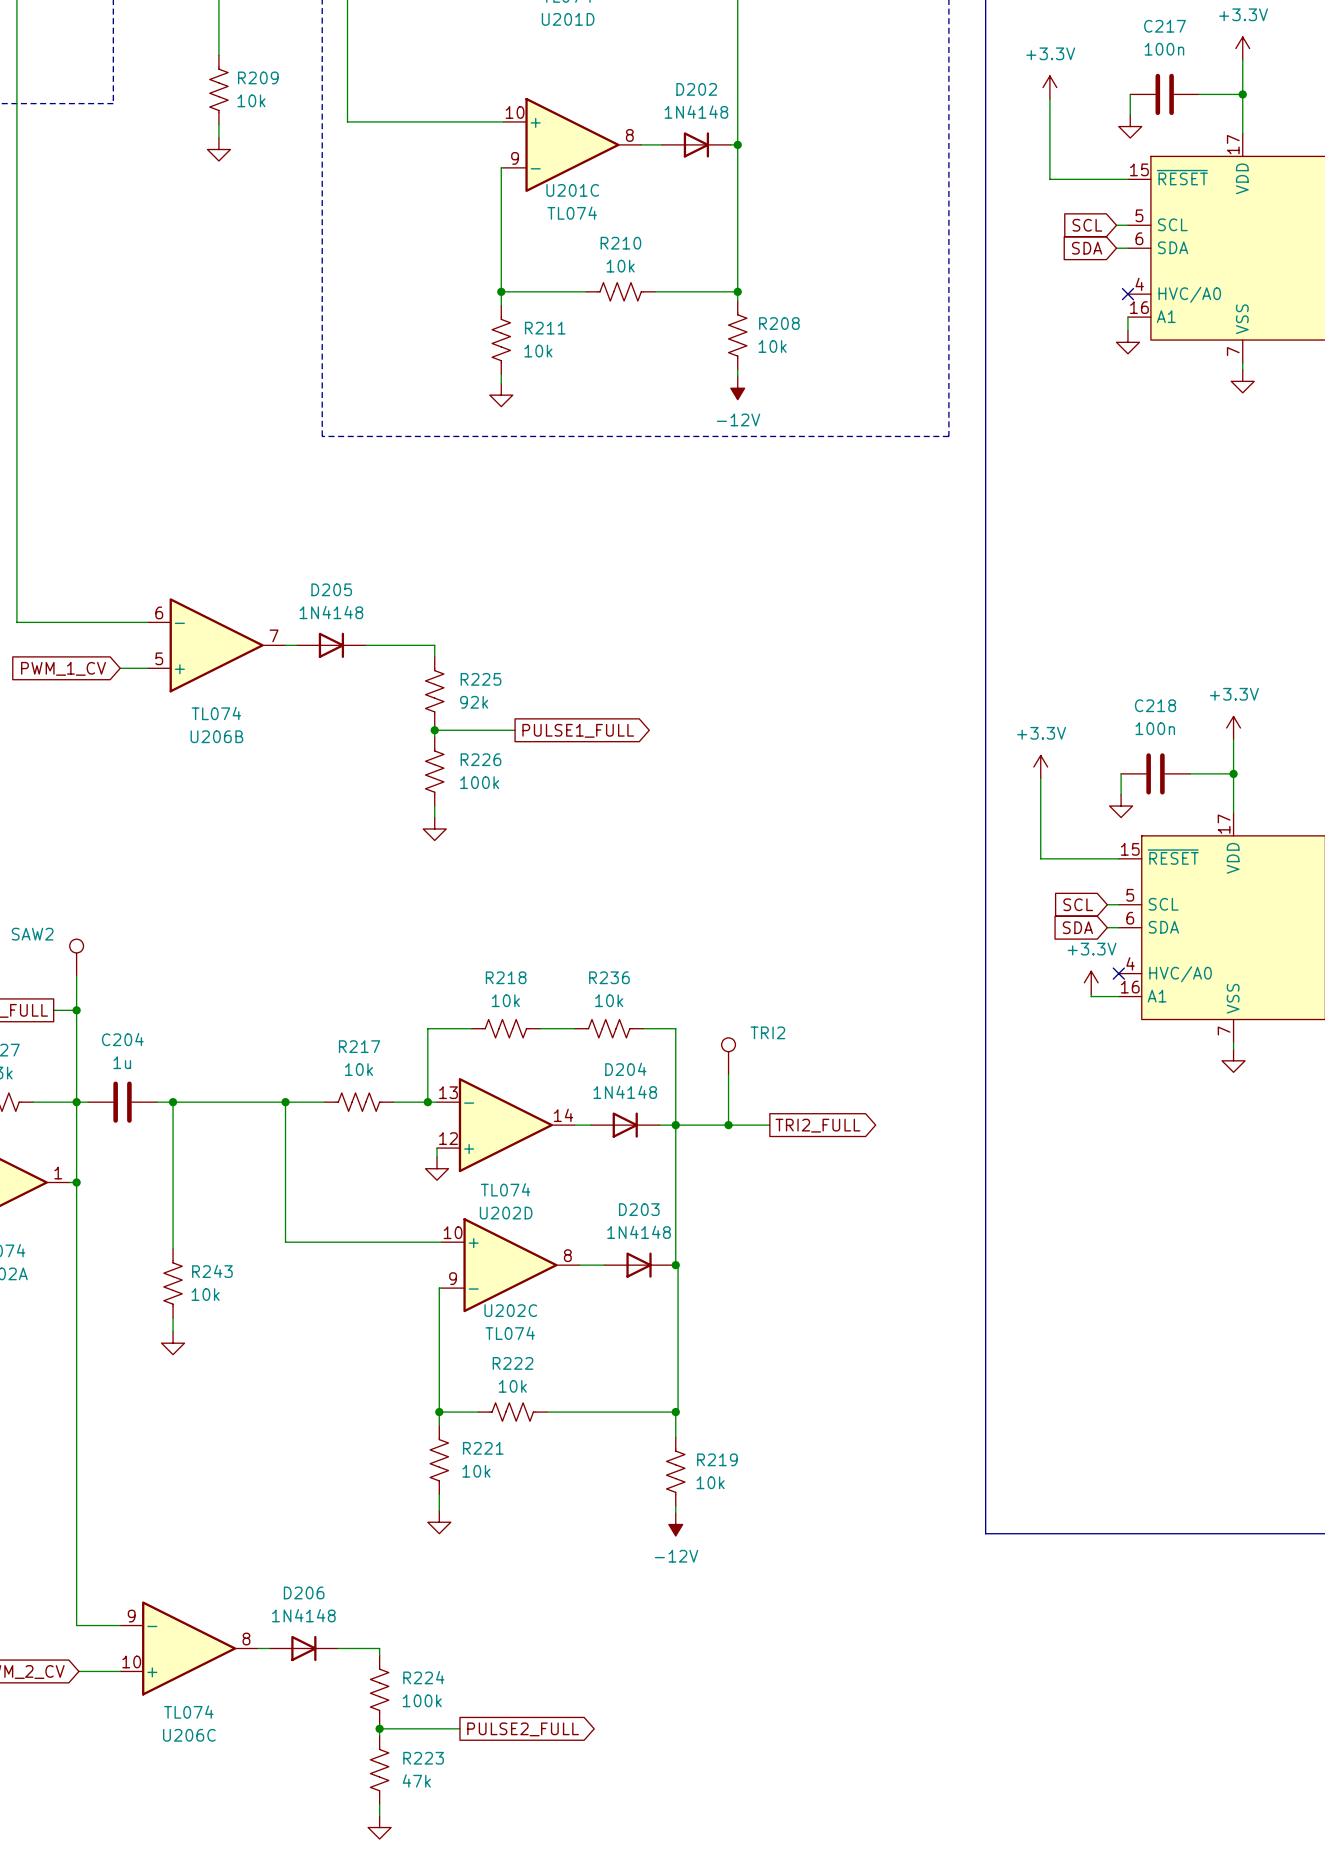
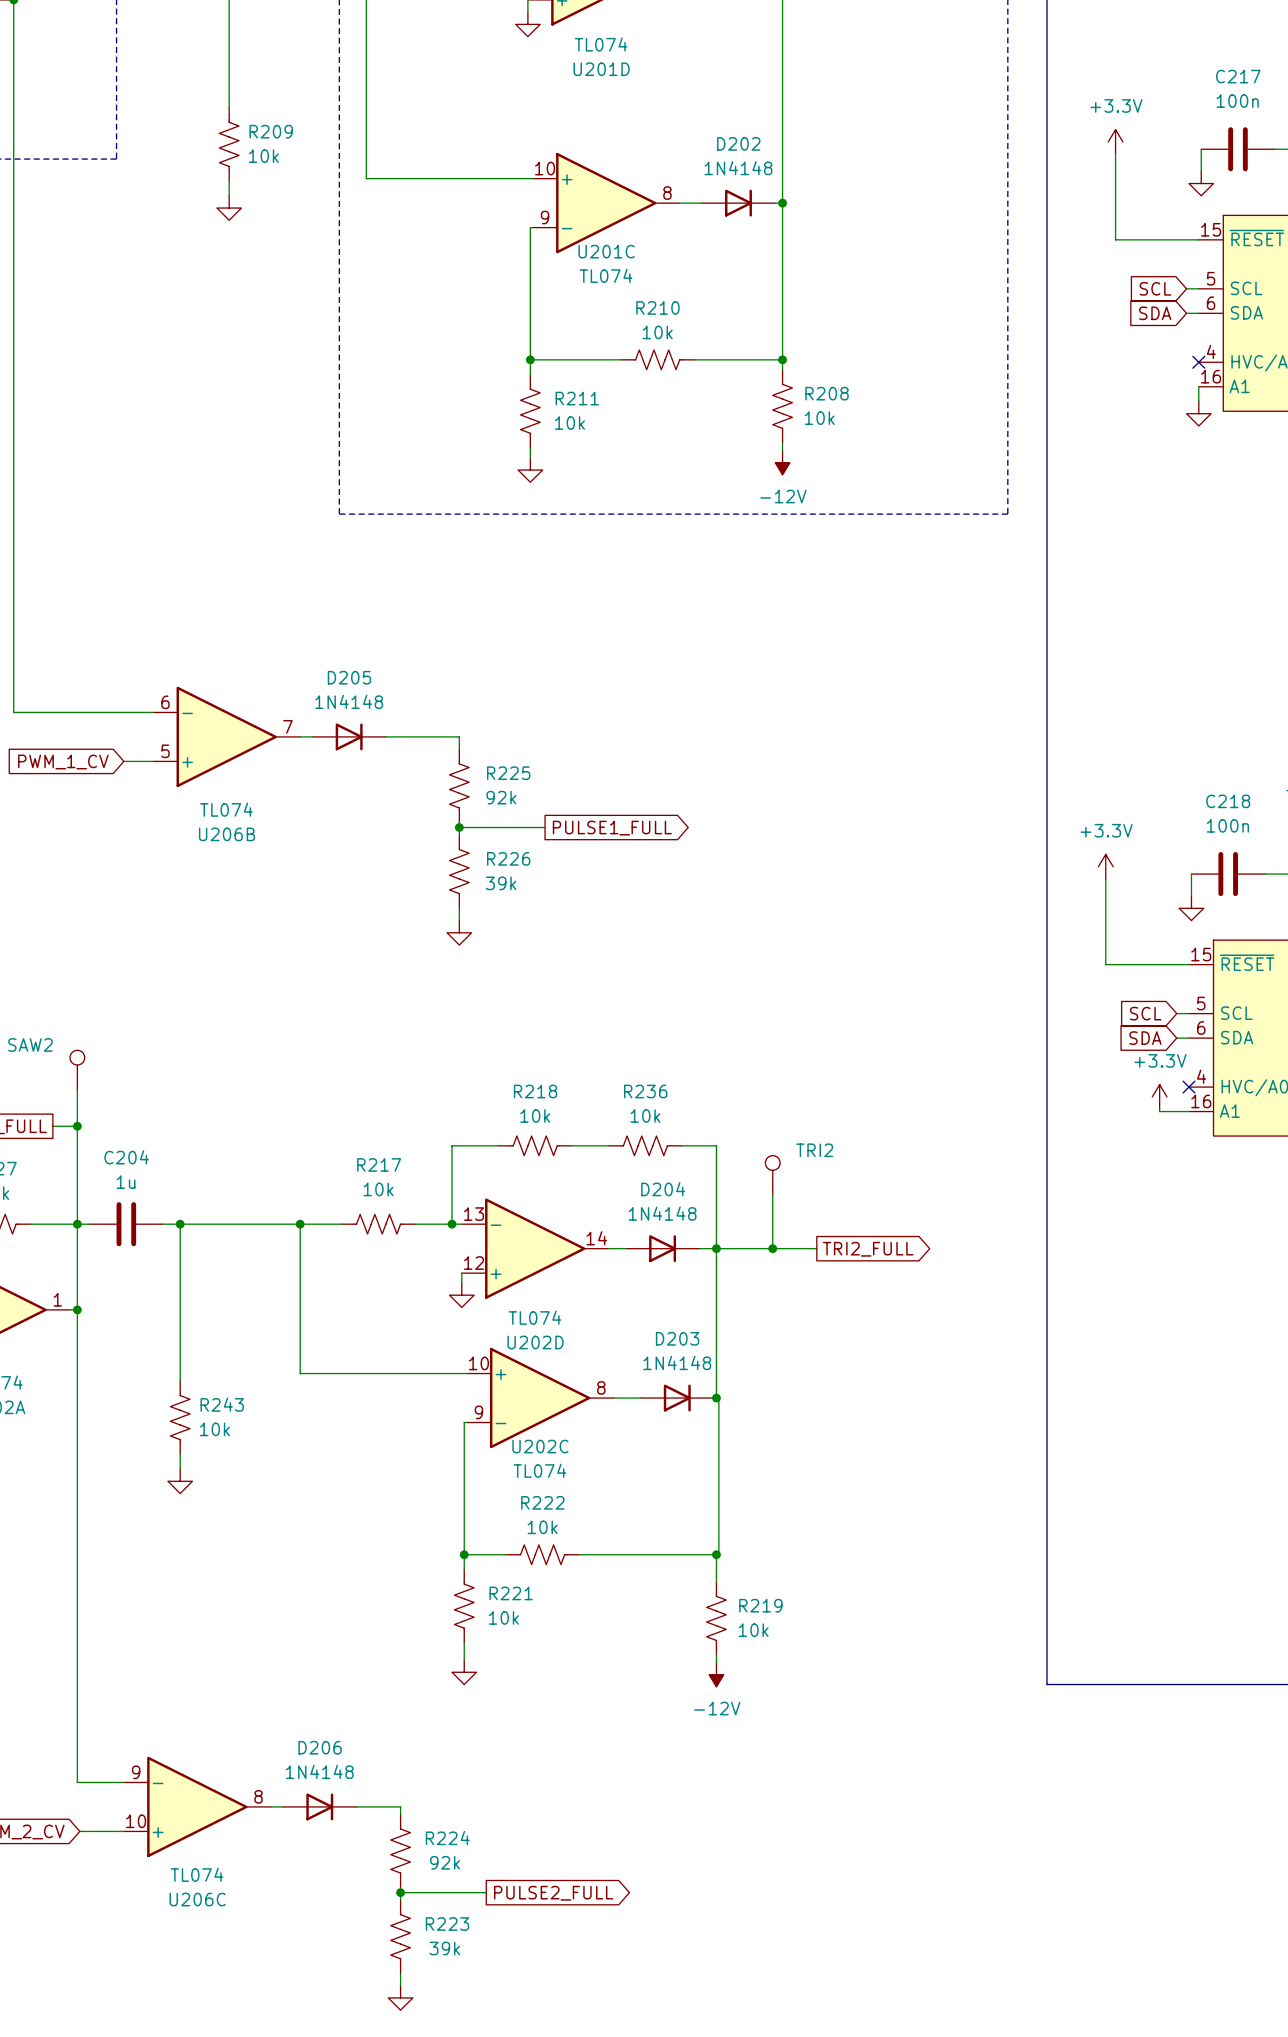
R226 value: 100k (479, 782) -> 39k (501, 883)
R224 value: 100k (422, 1700) -> 92k (445, 1862)
R223 value: 47k (416, 1780) -> 39k (444, 1948)

